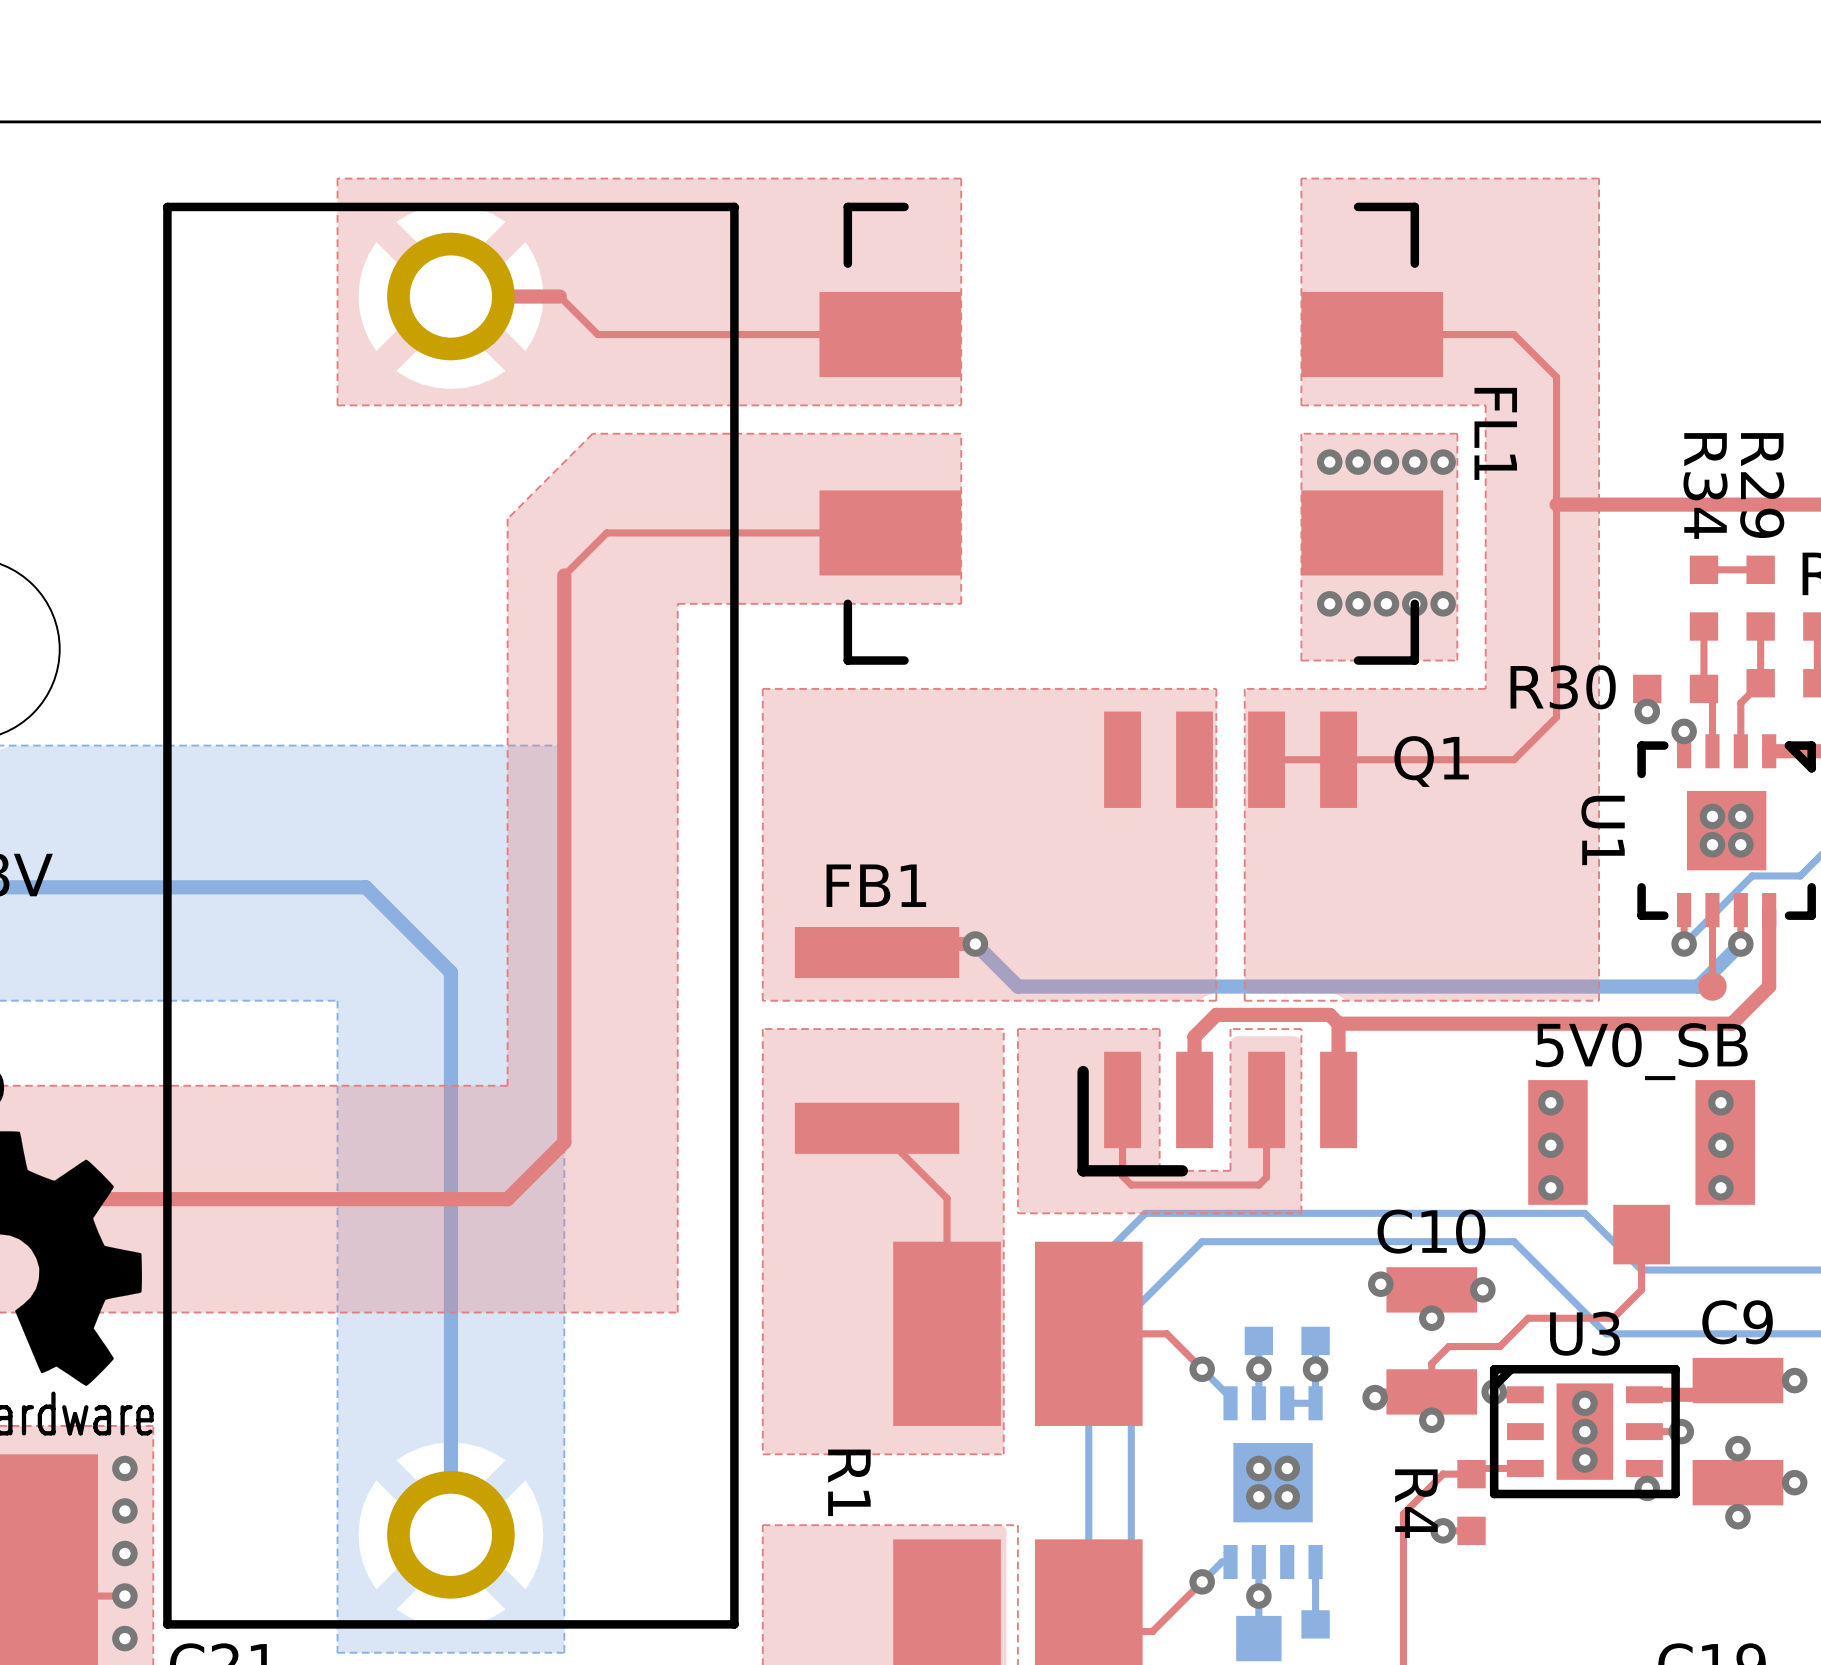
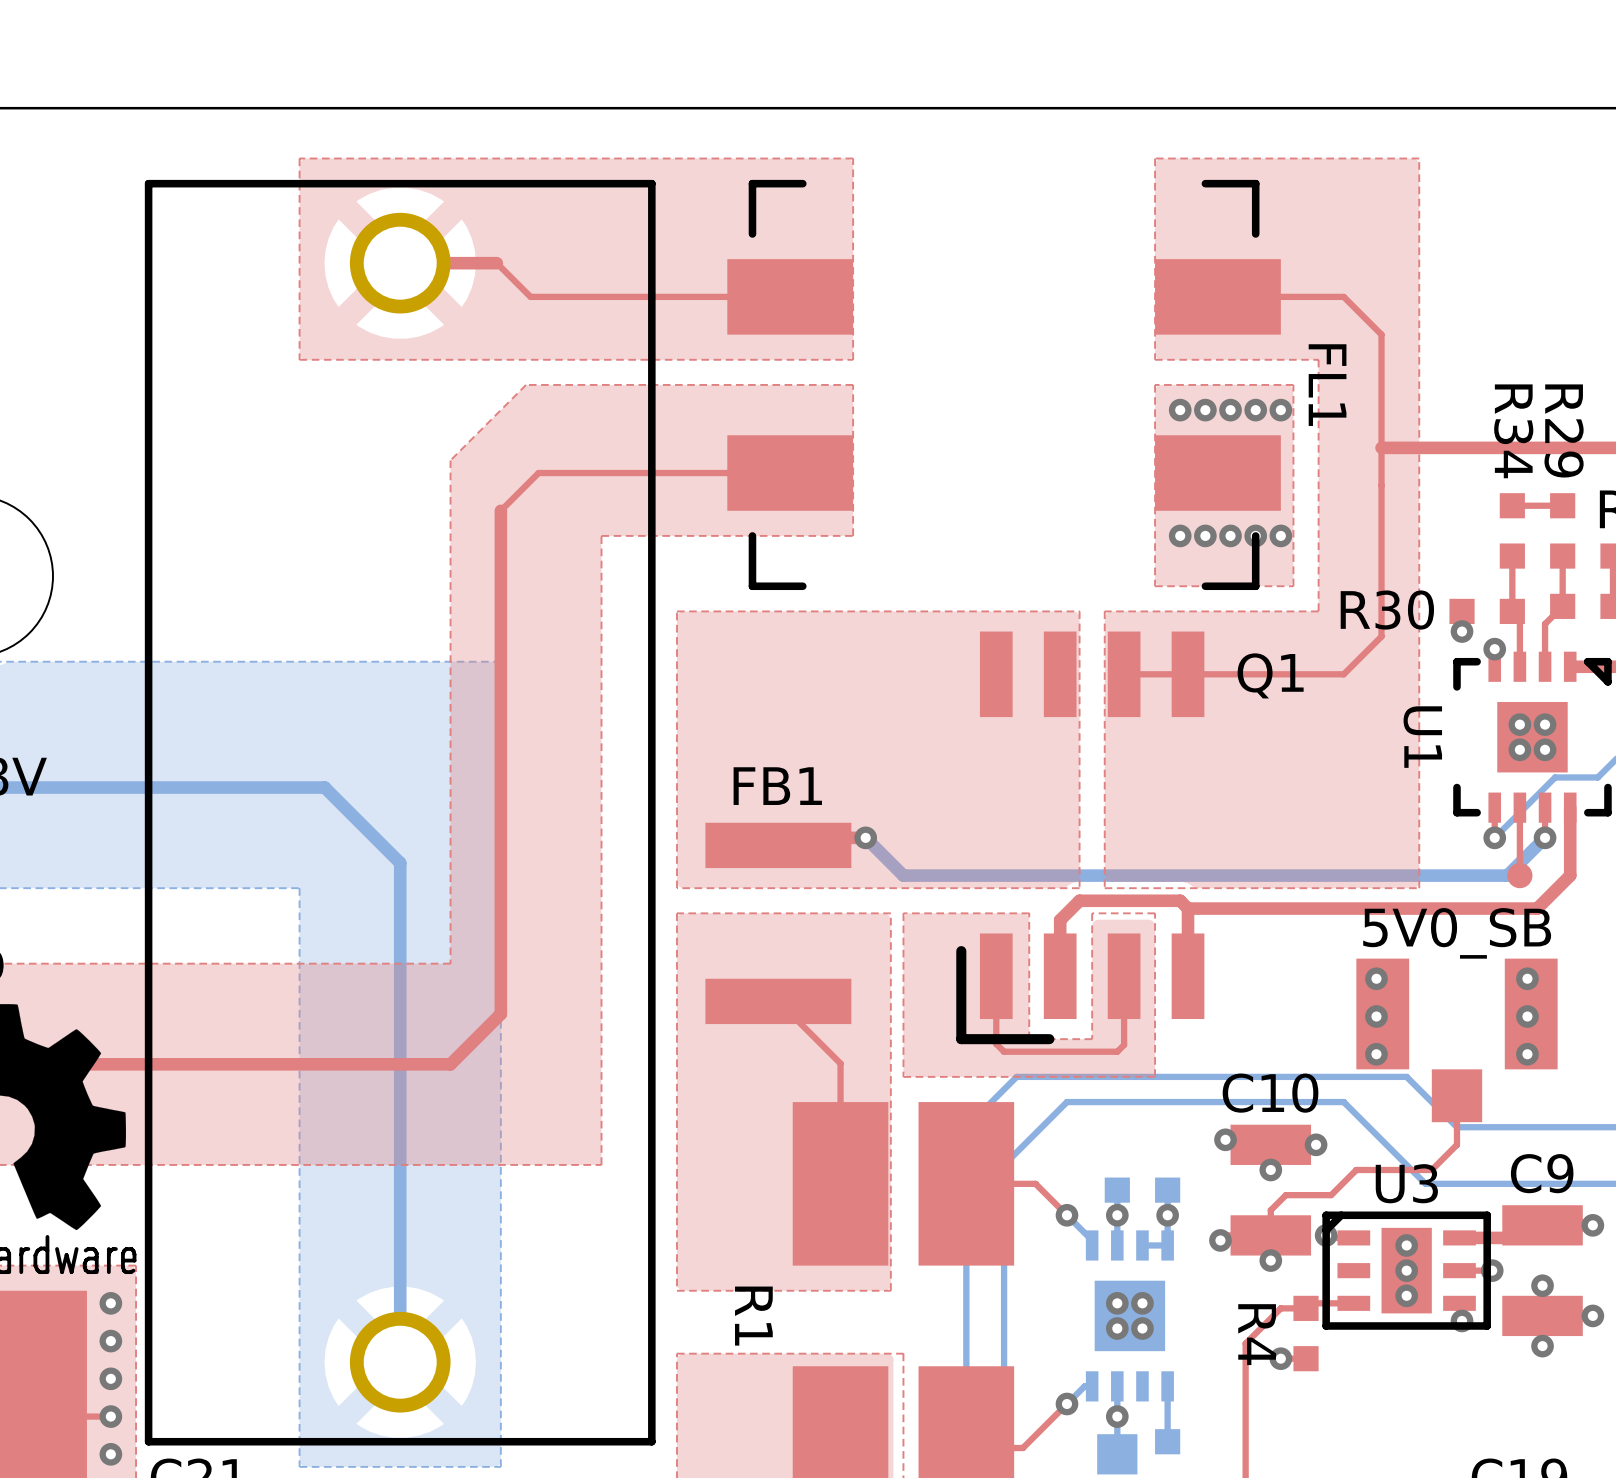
part footprint: [163, 202, 739, 1629] -> [144, 179, 656, 1446]

